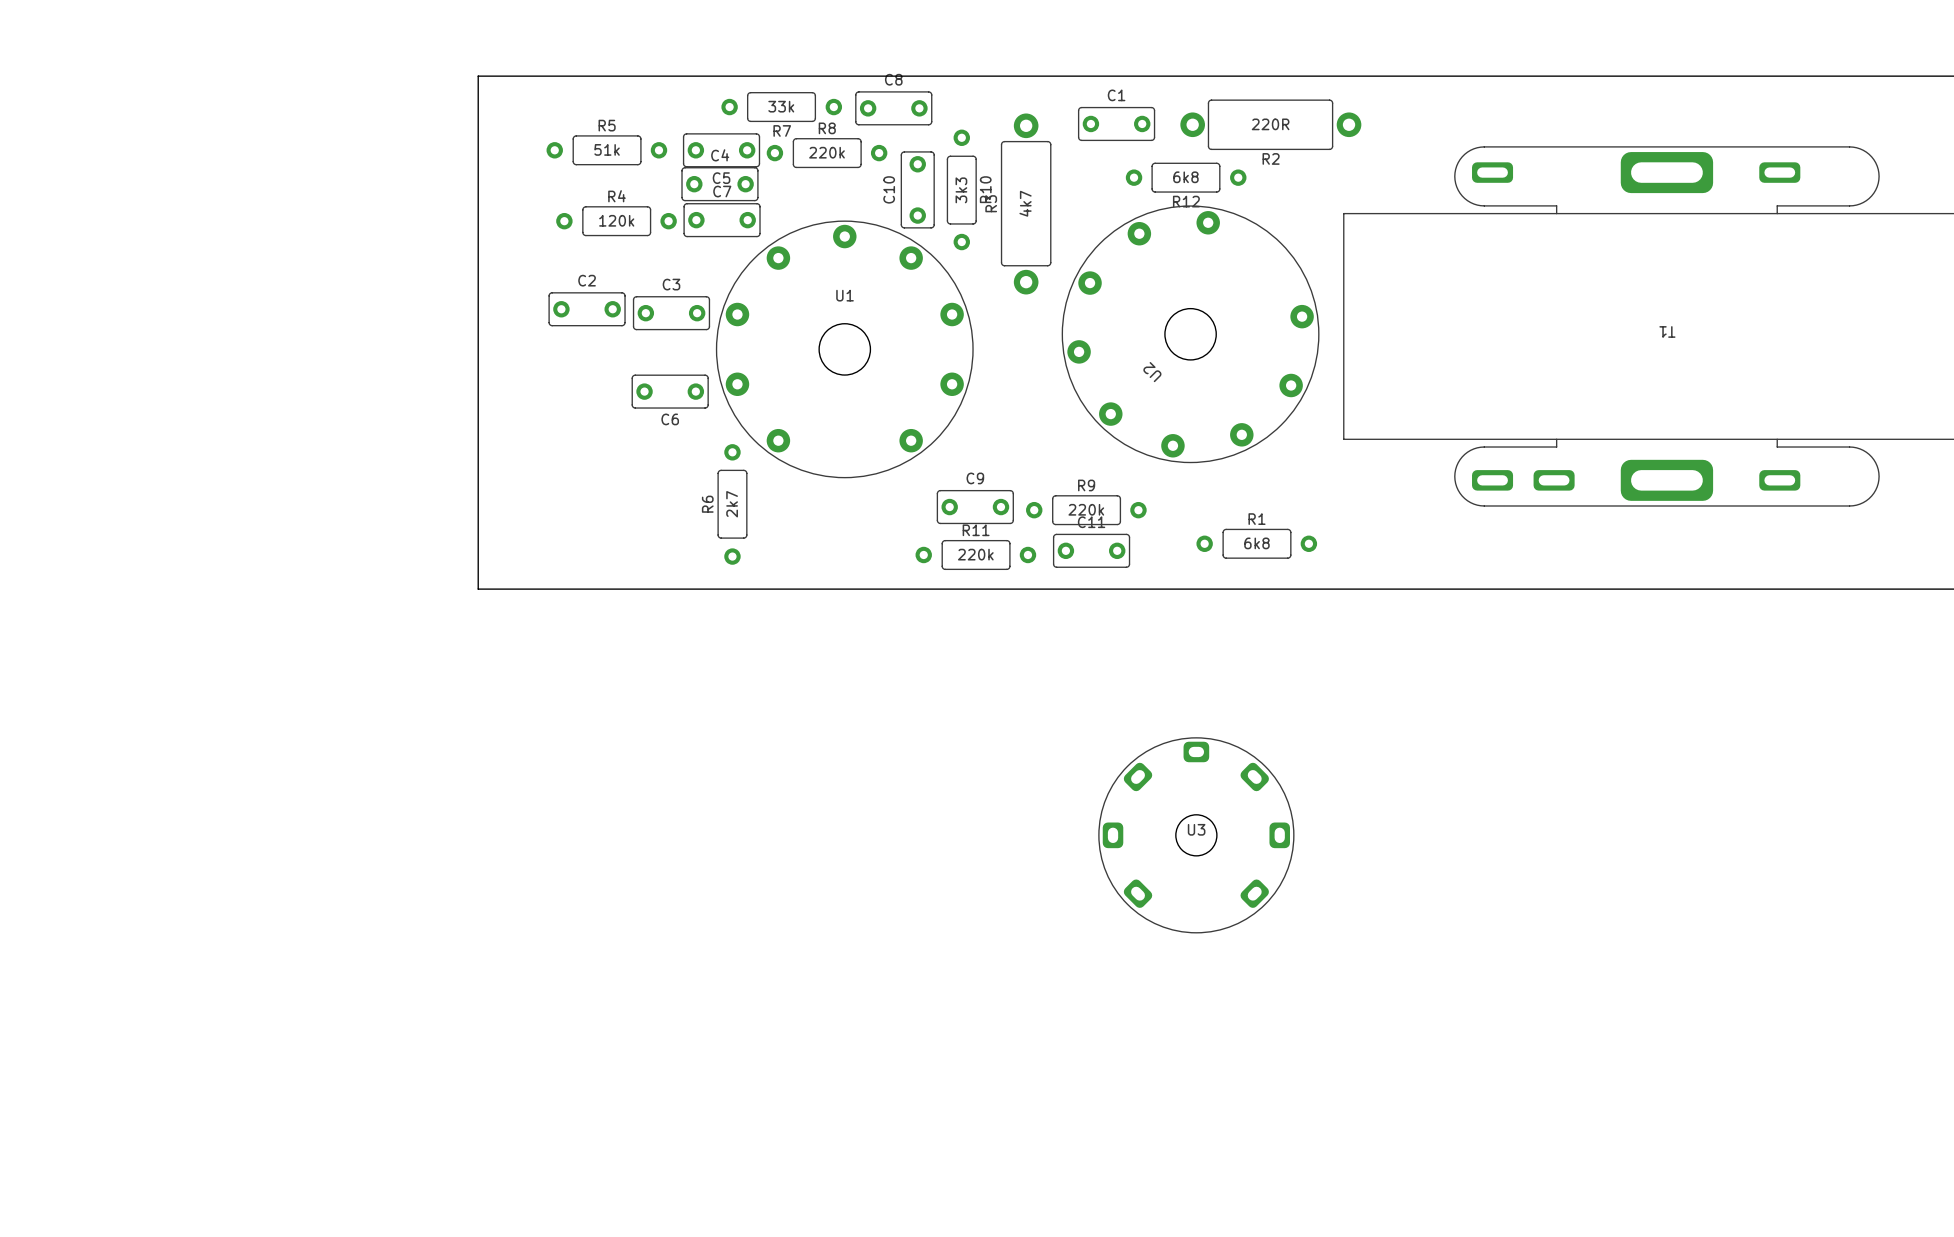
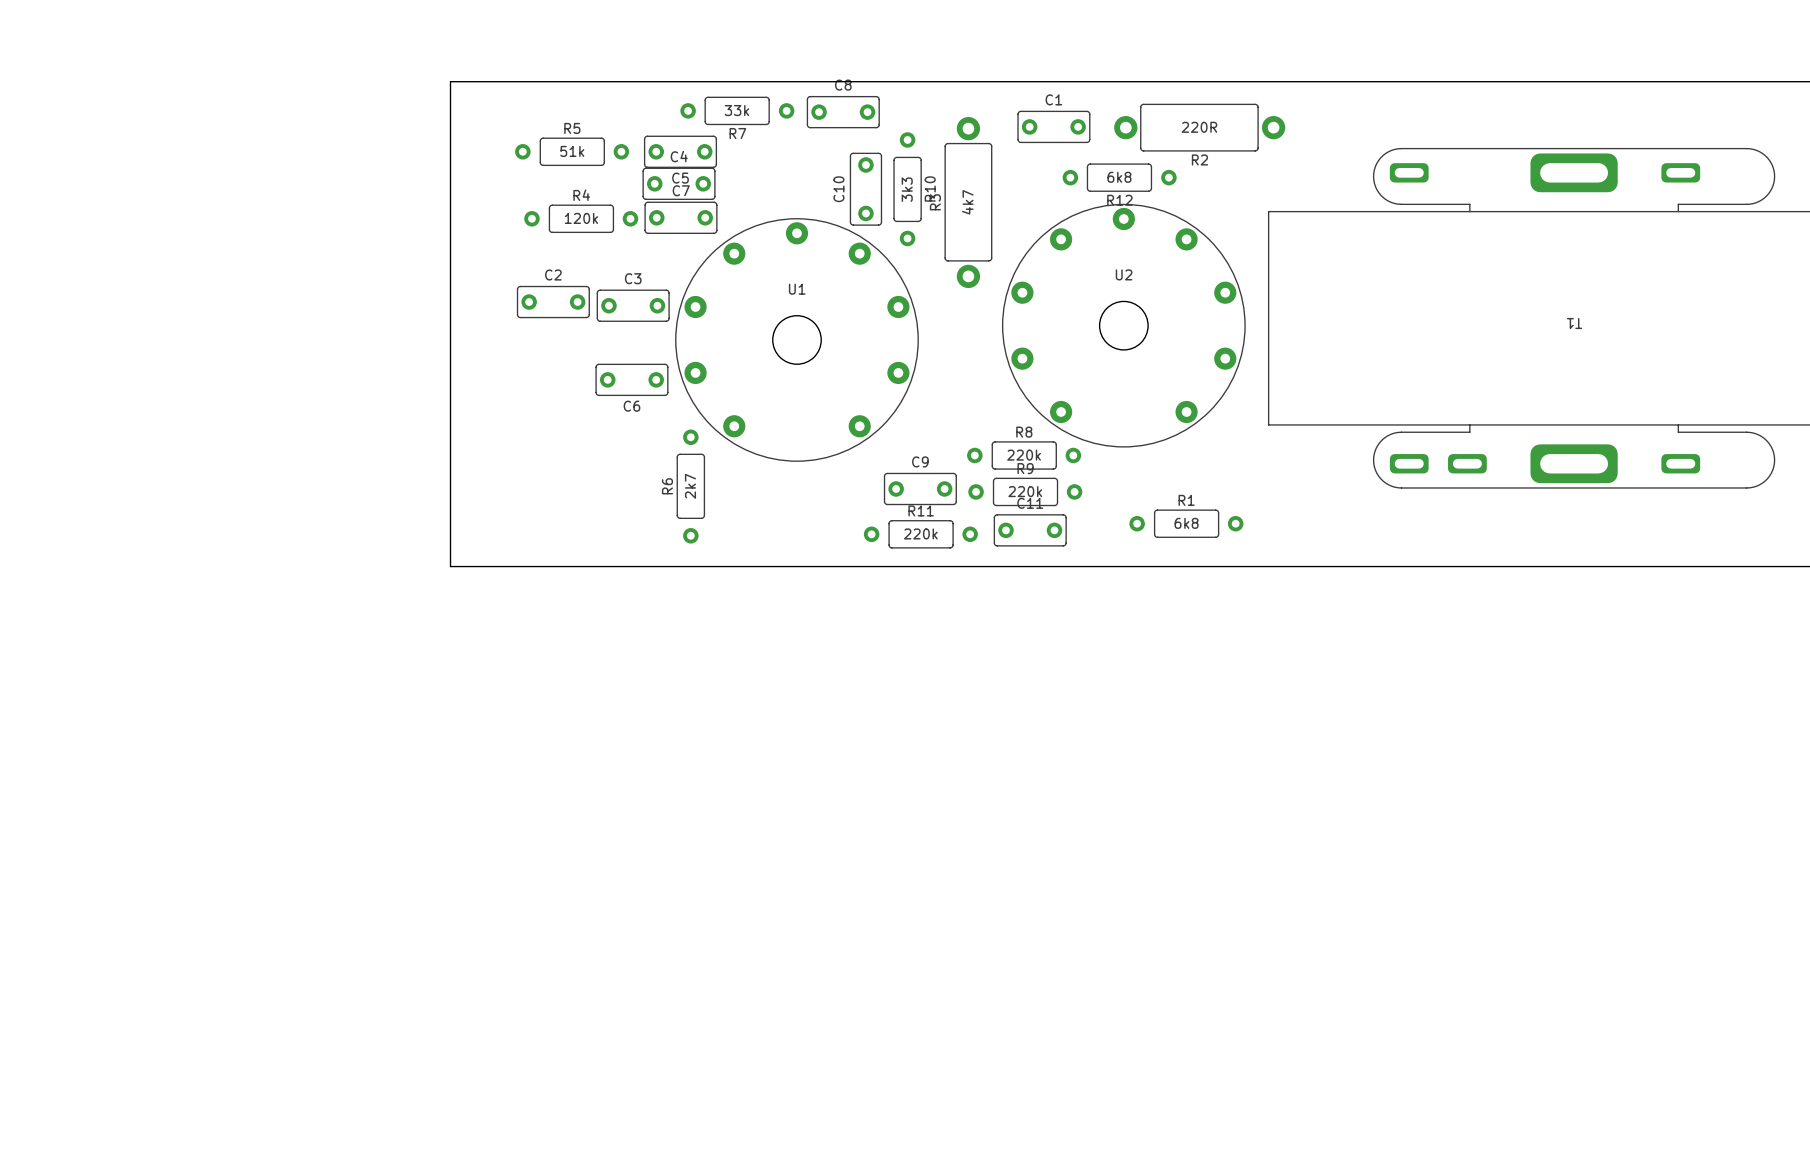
R8 position: (827, 153) -> (1024, 455)
U2 rotation: 0° (1190, 334) -> 135° clockwise (1123, 325)
U3: (1196, 835) -> none

